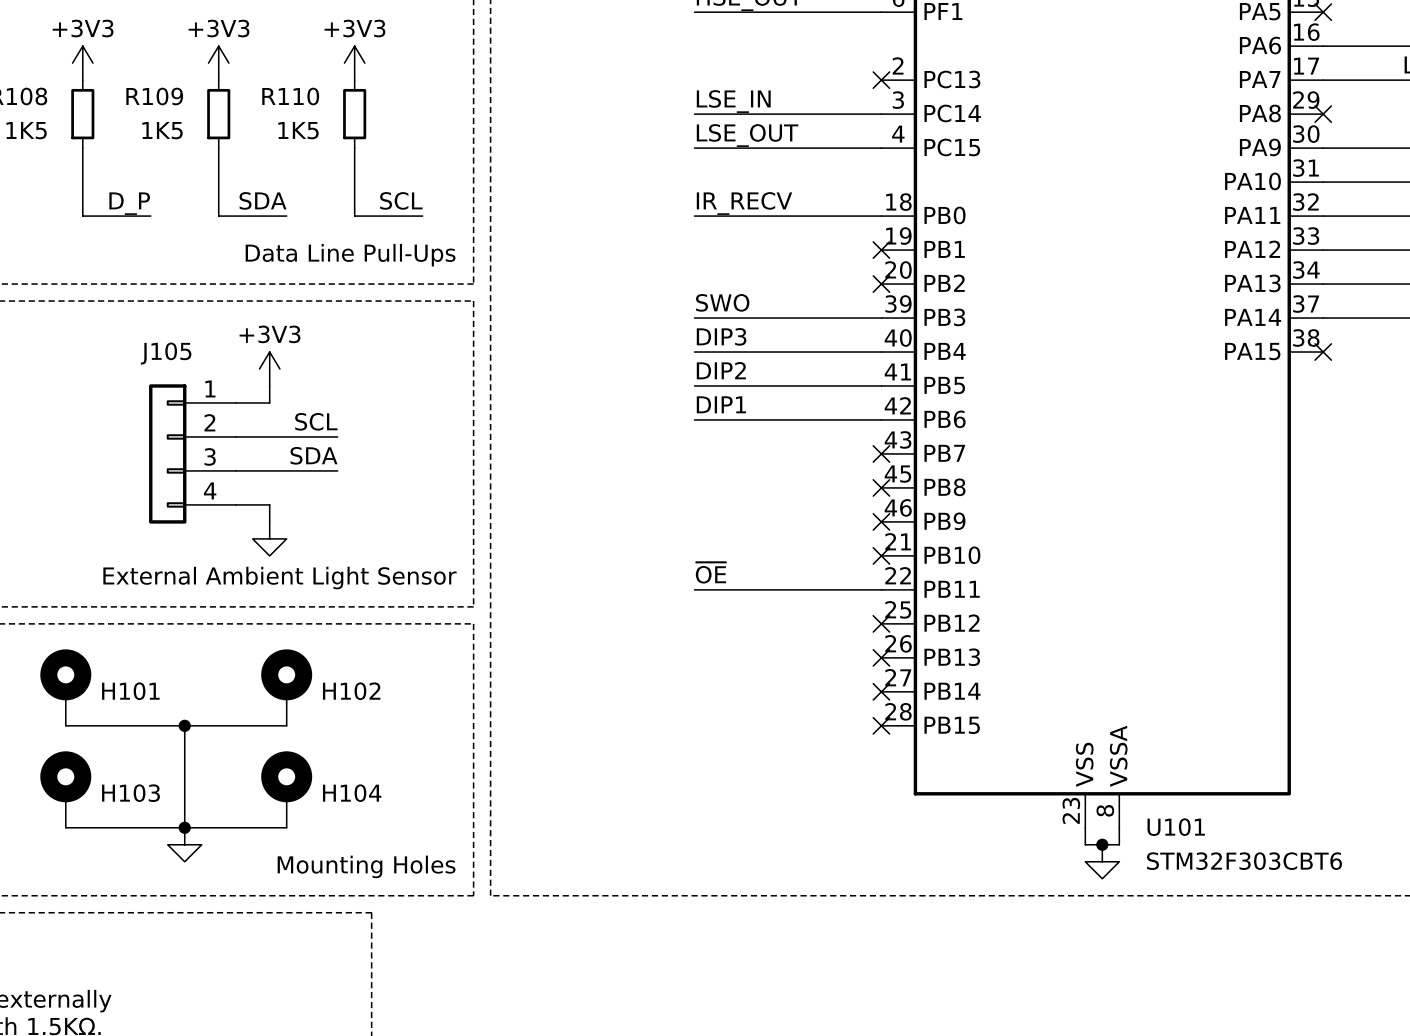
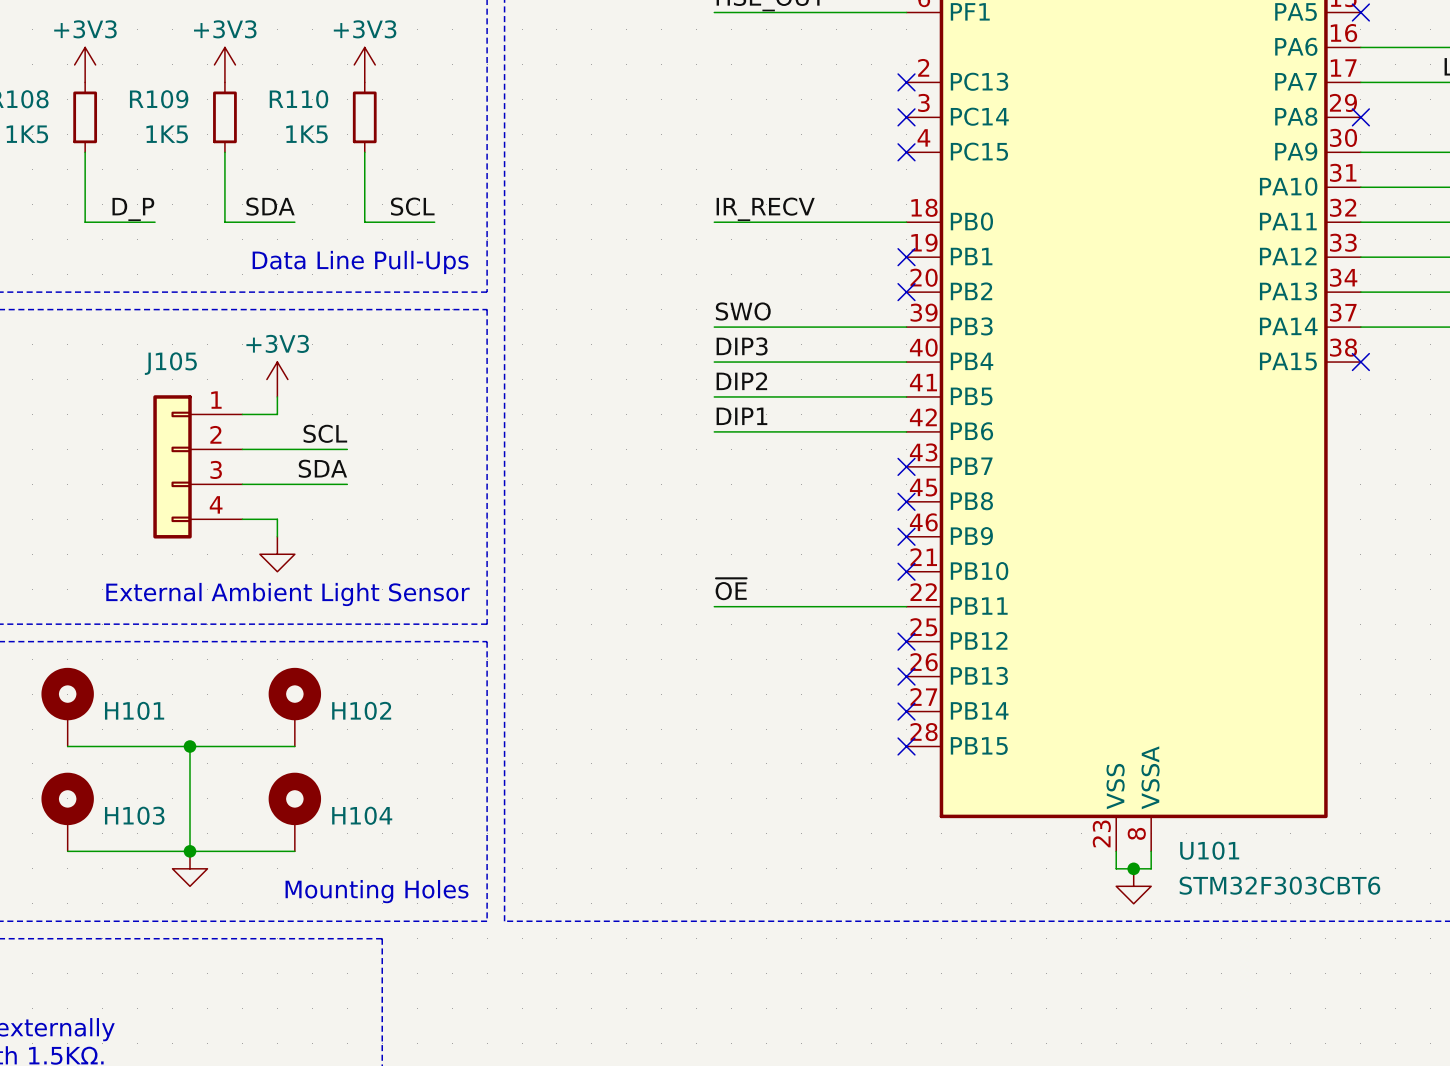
label: LSE_IN (733, 101) -> none
wire: (694, 114) (881, 114) -> none
no-connect mark: none -> (906, 117)
label: LSE_OUT (747, 135) -> none
wire: (694, 148) (881, 148) -> none
no-connect mark: none -> (906, 152)

